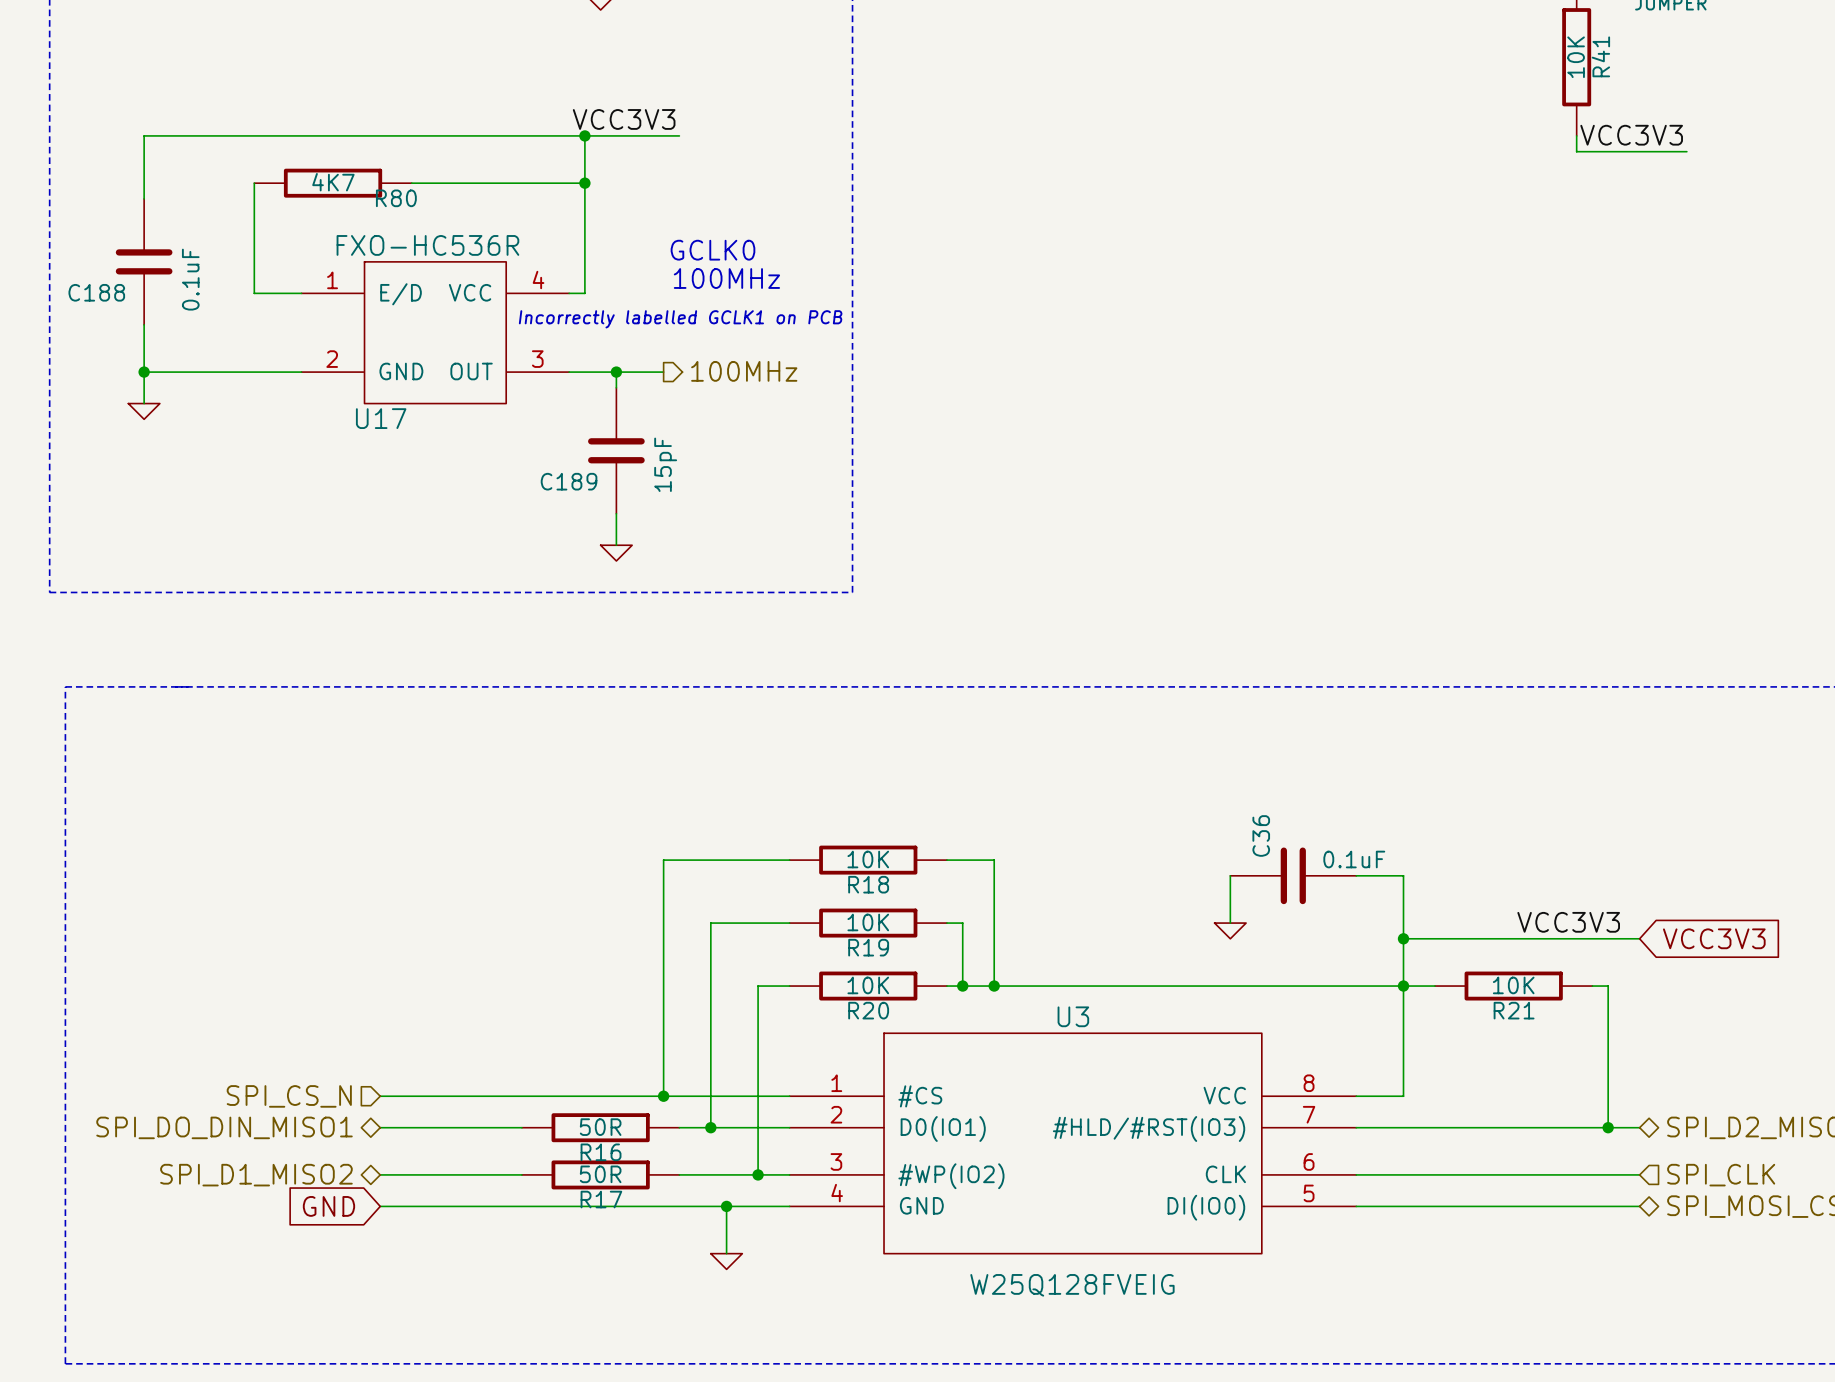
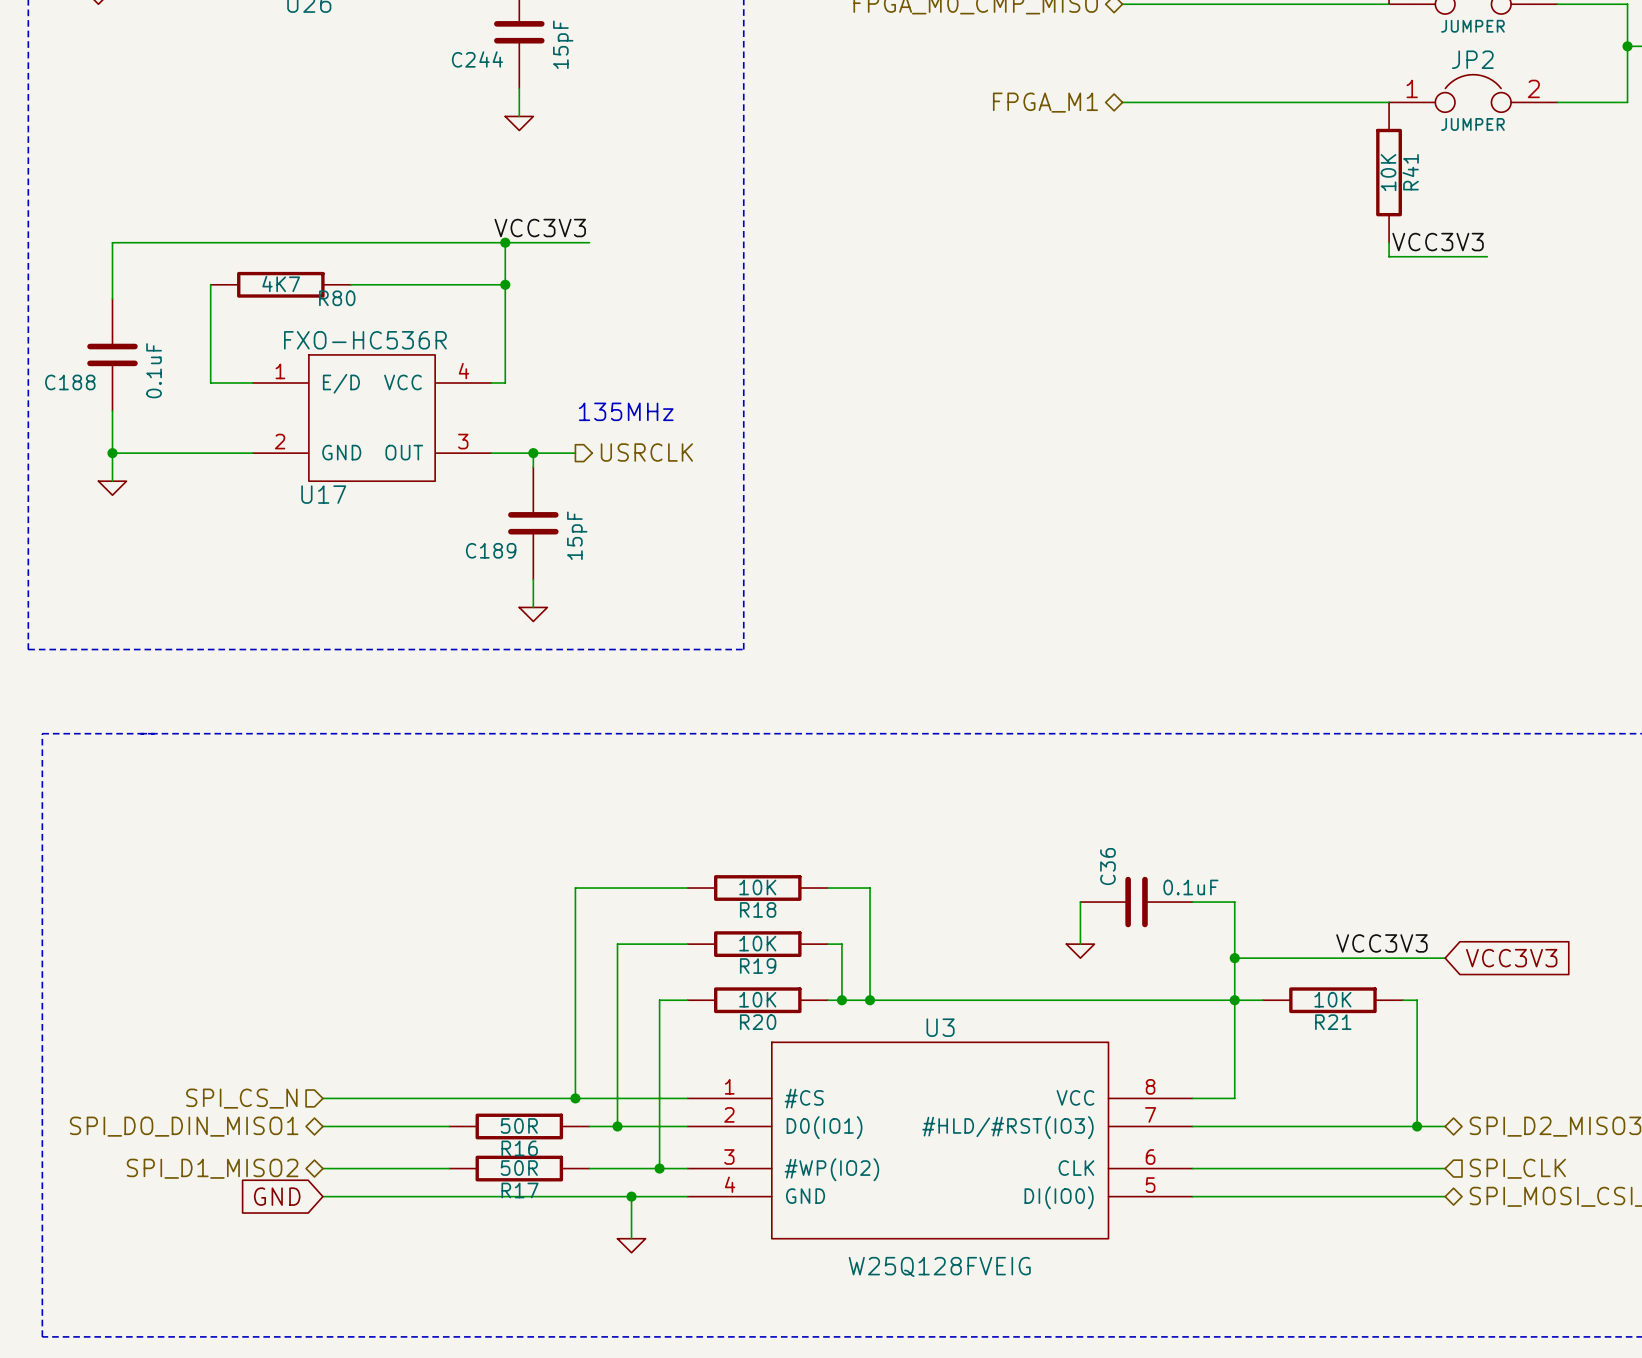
text: GCLK0 (712, 250) -> none
text: 100MHz (726, 278) -> none
text: Incorrectly labelled GCLK1 on PCB (680, 319) -> none
text: none -> 135MHz (626, 411)
hierarchical label: 100MHz (744, 371) -> USRCLK (646, 452)

